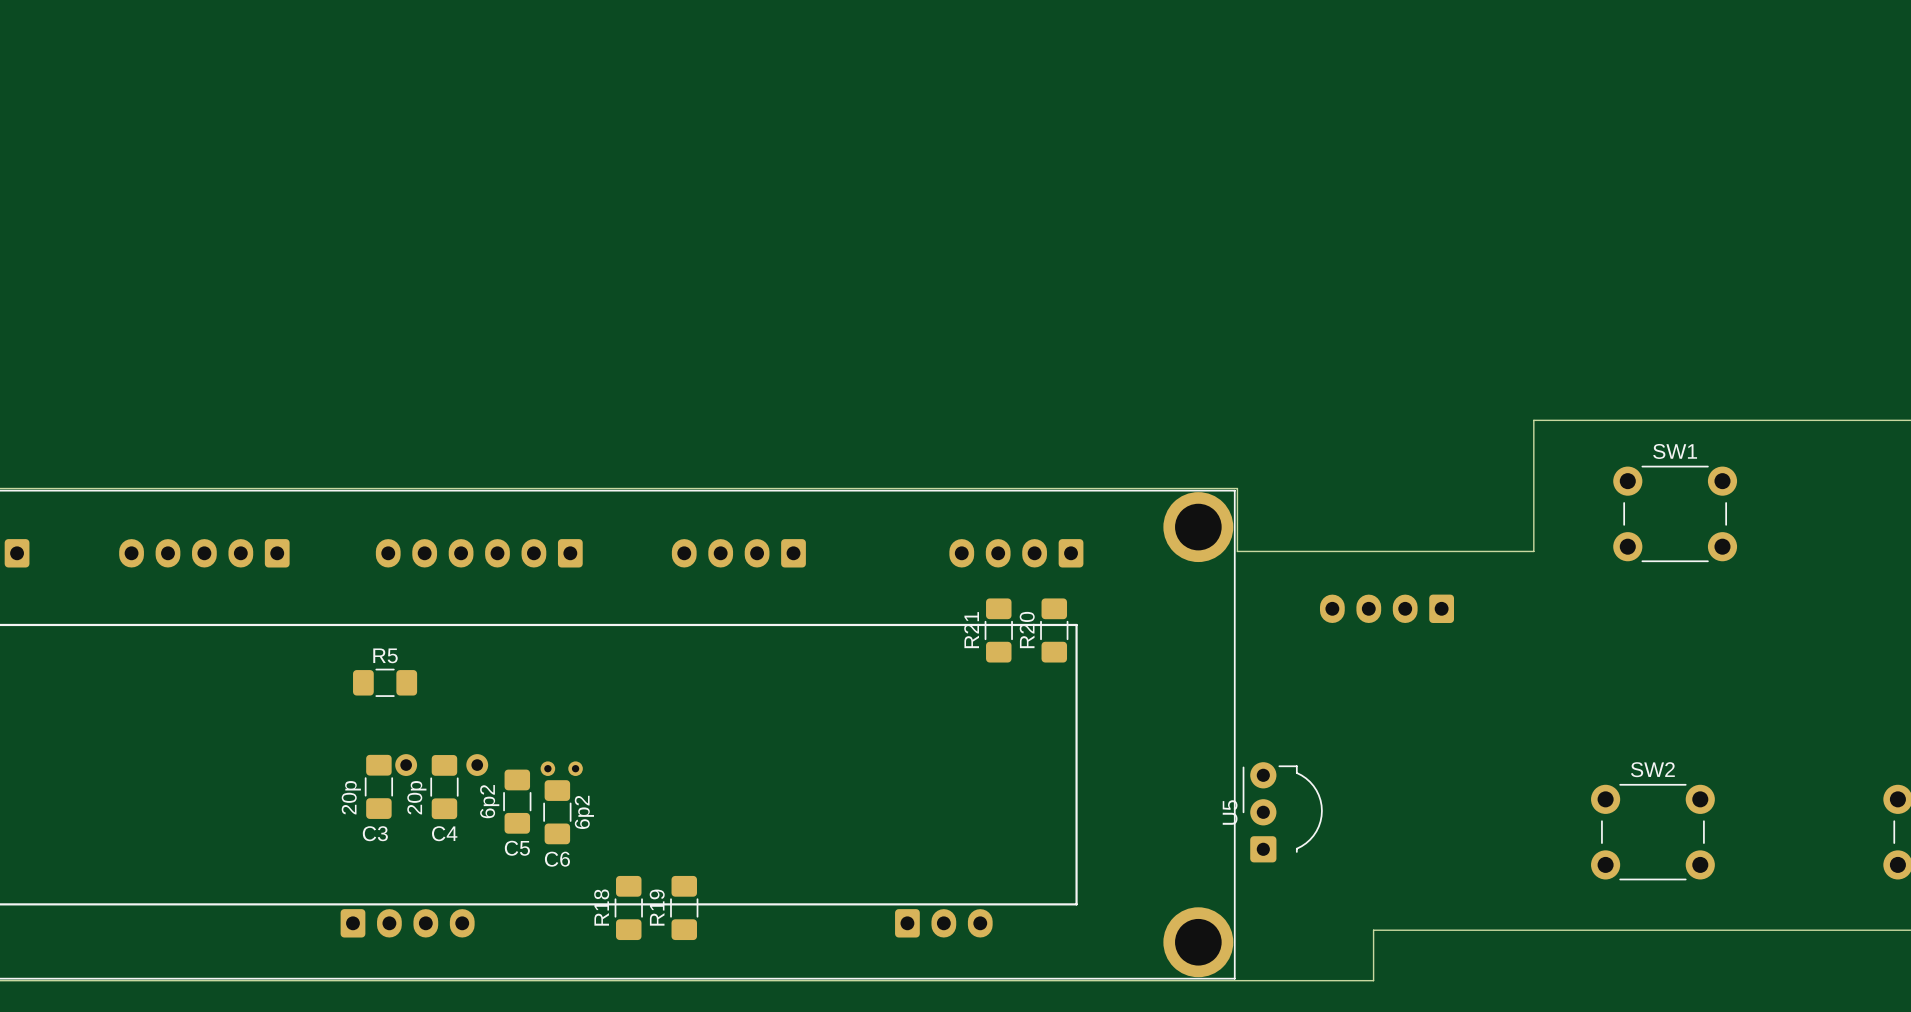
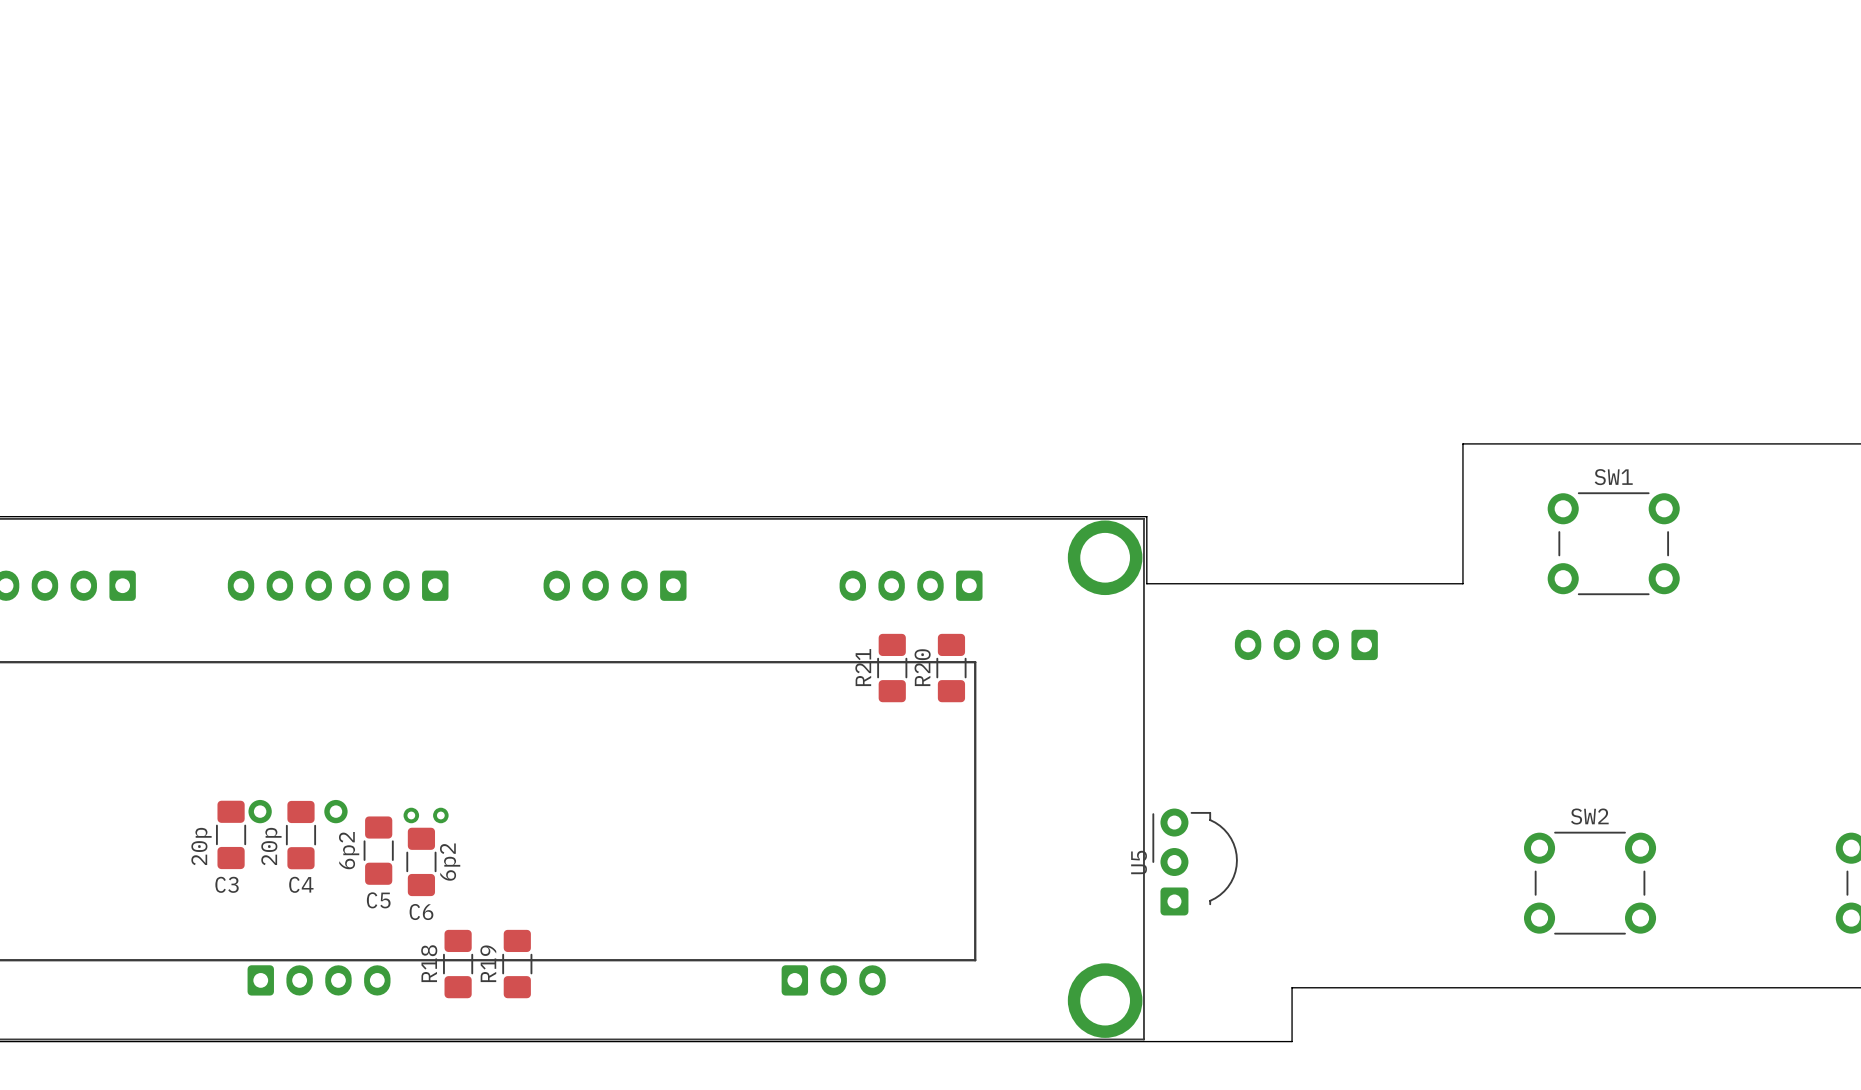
R5: (385, 682) -> none
R18 position: (628, 907) -> (458, 964)
R19 position: (684, 907) -> (517, 964)
part position: (407, 923) -> (319, 980)

